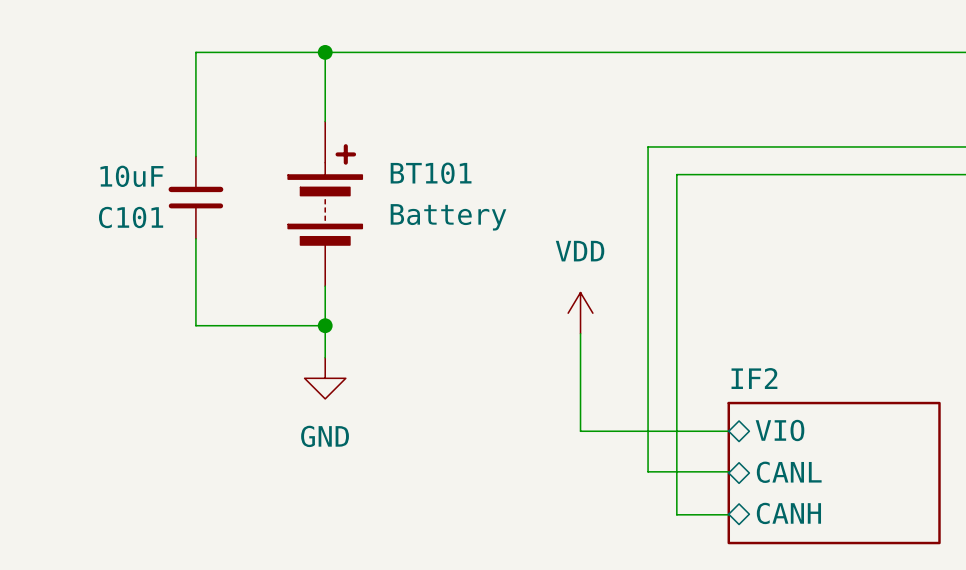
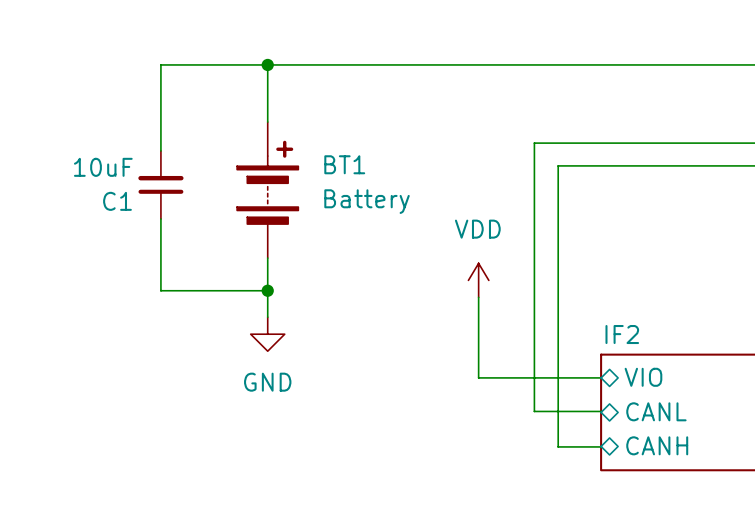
BT101 name: BT101 (431, 173) -> BT1 (344, 164)
C101 name: C101 (131, 217) -> C1 (117, 201)

